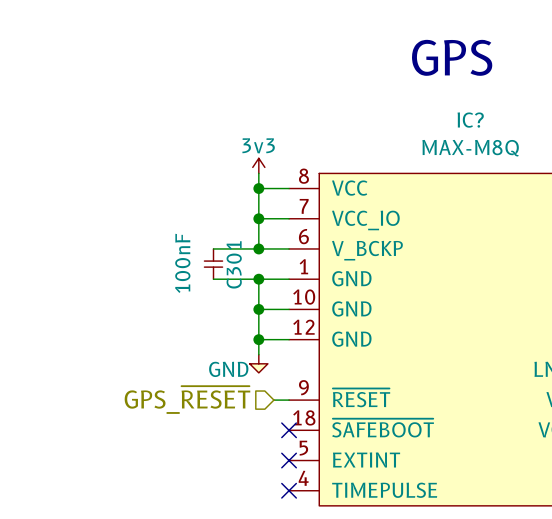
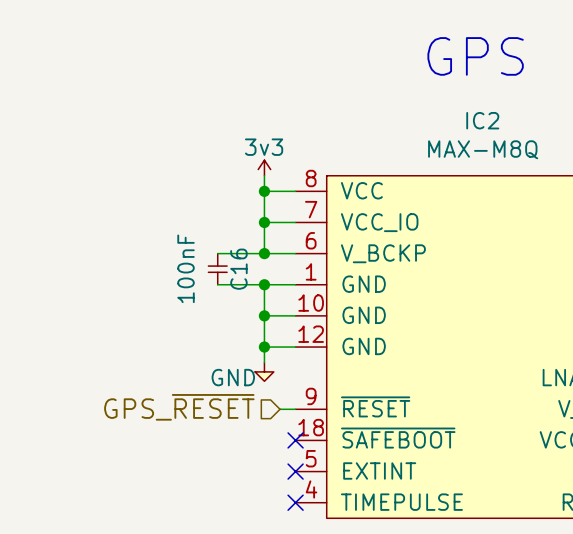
IC? name: IC? (470, 120) -> IC2 (482, 120)
C301 name: C301 (234, 264) -> C16 (238, 269)

